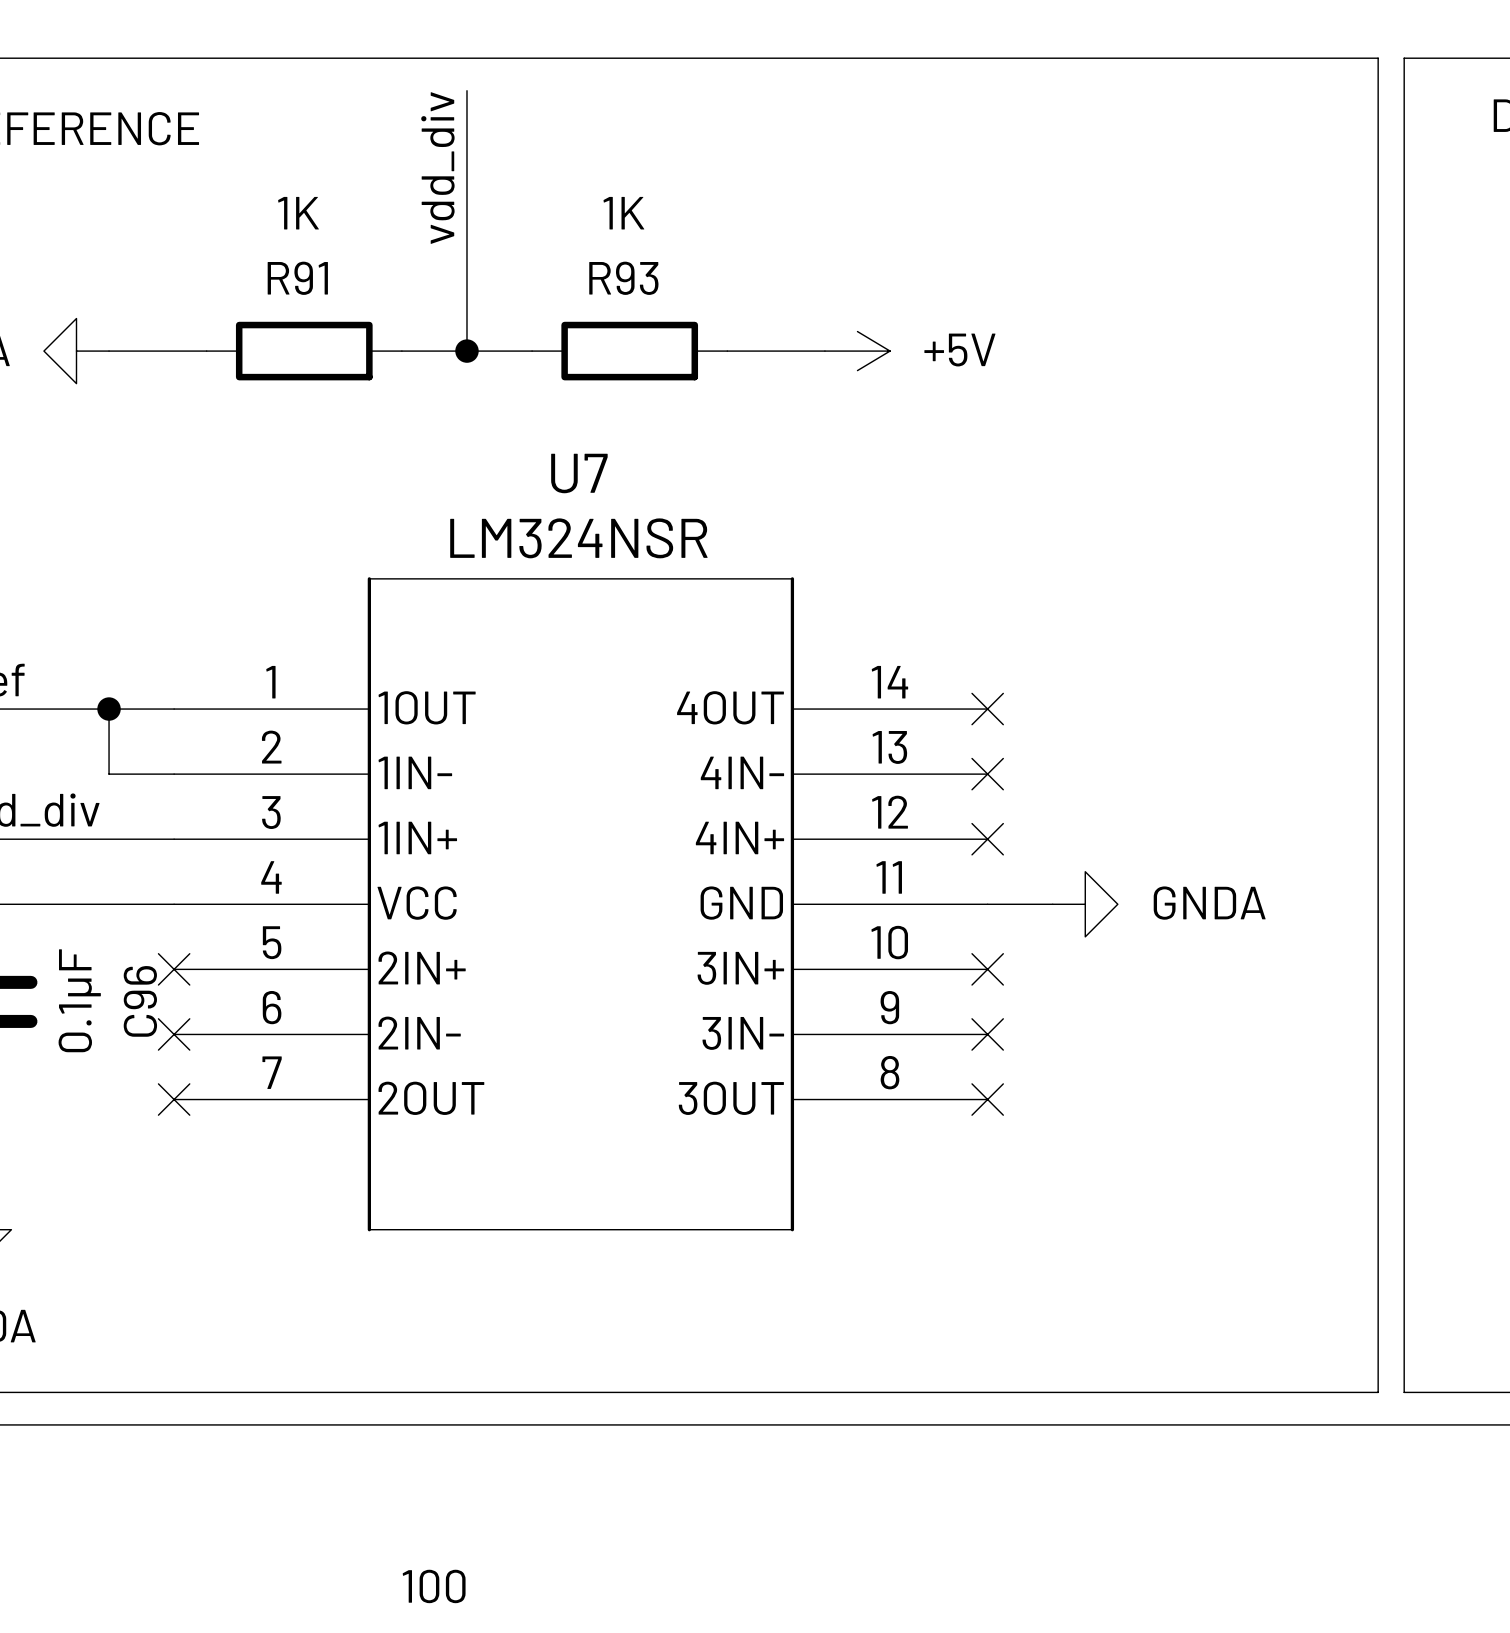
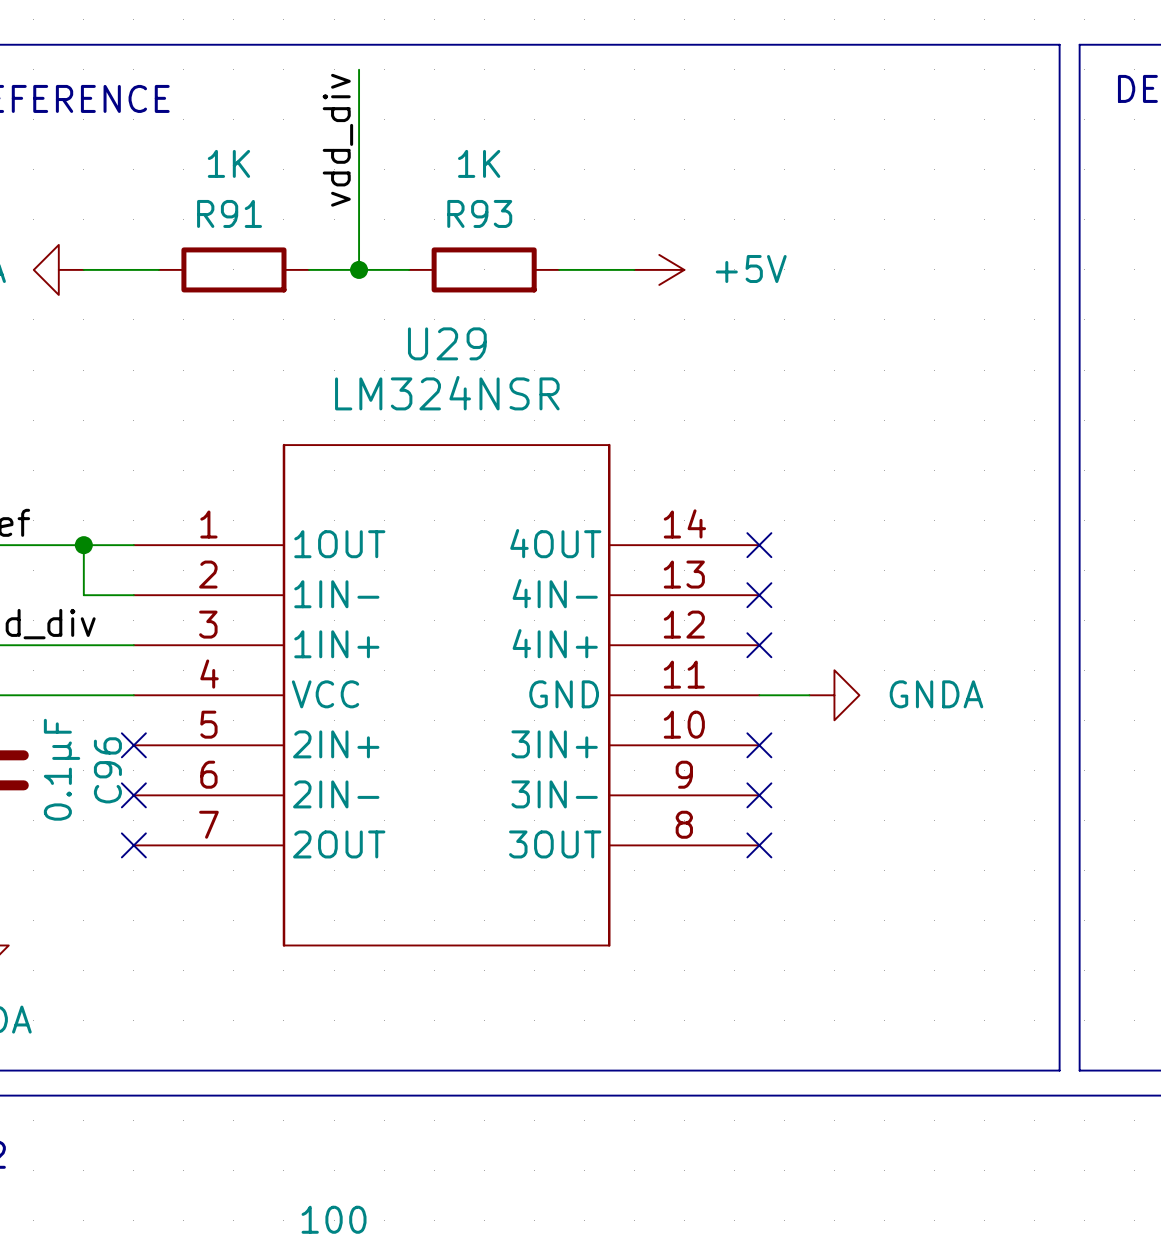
U7 name: U7 (579, 473) -> U29 (447, 343)
U7 value position: LM324NSR (578, 538) -> LM324NSR (447, 393)

